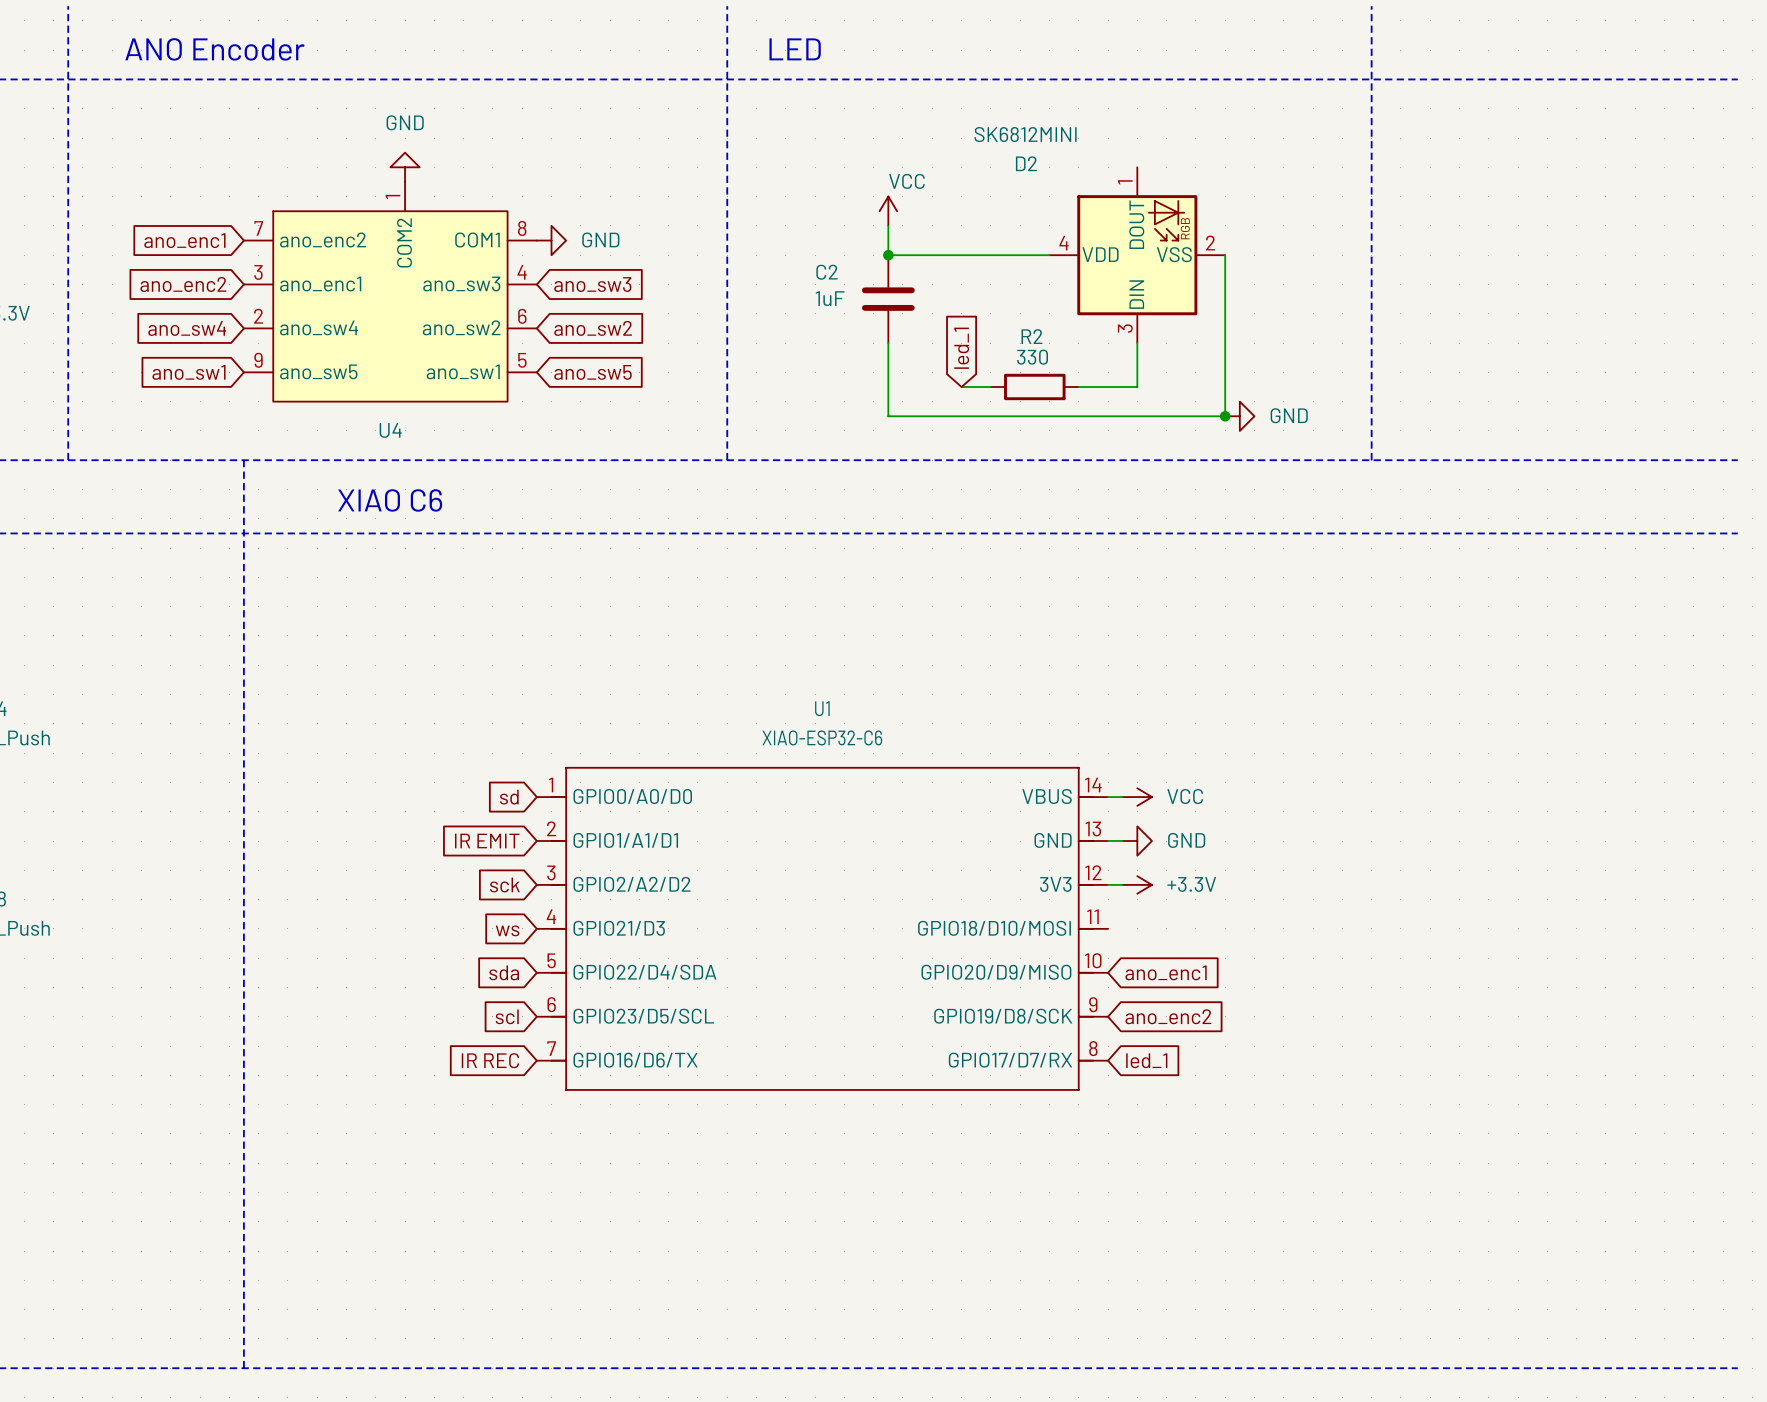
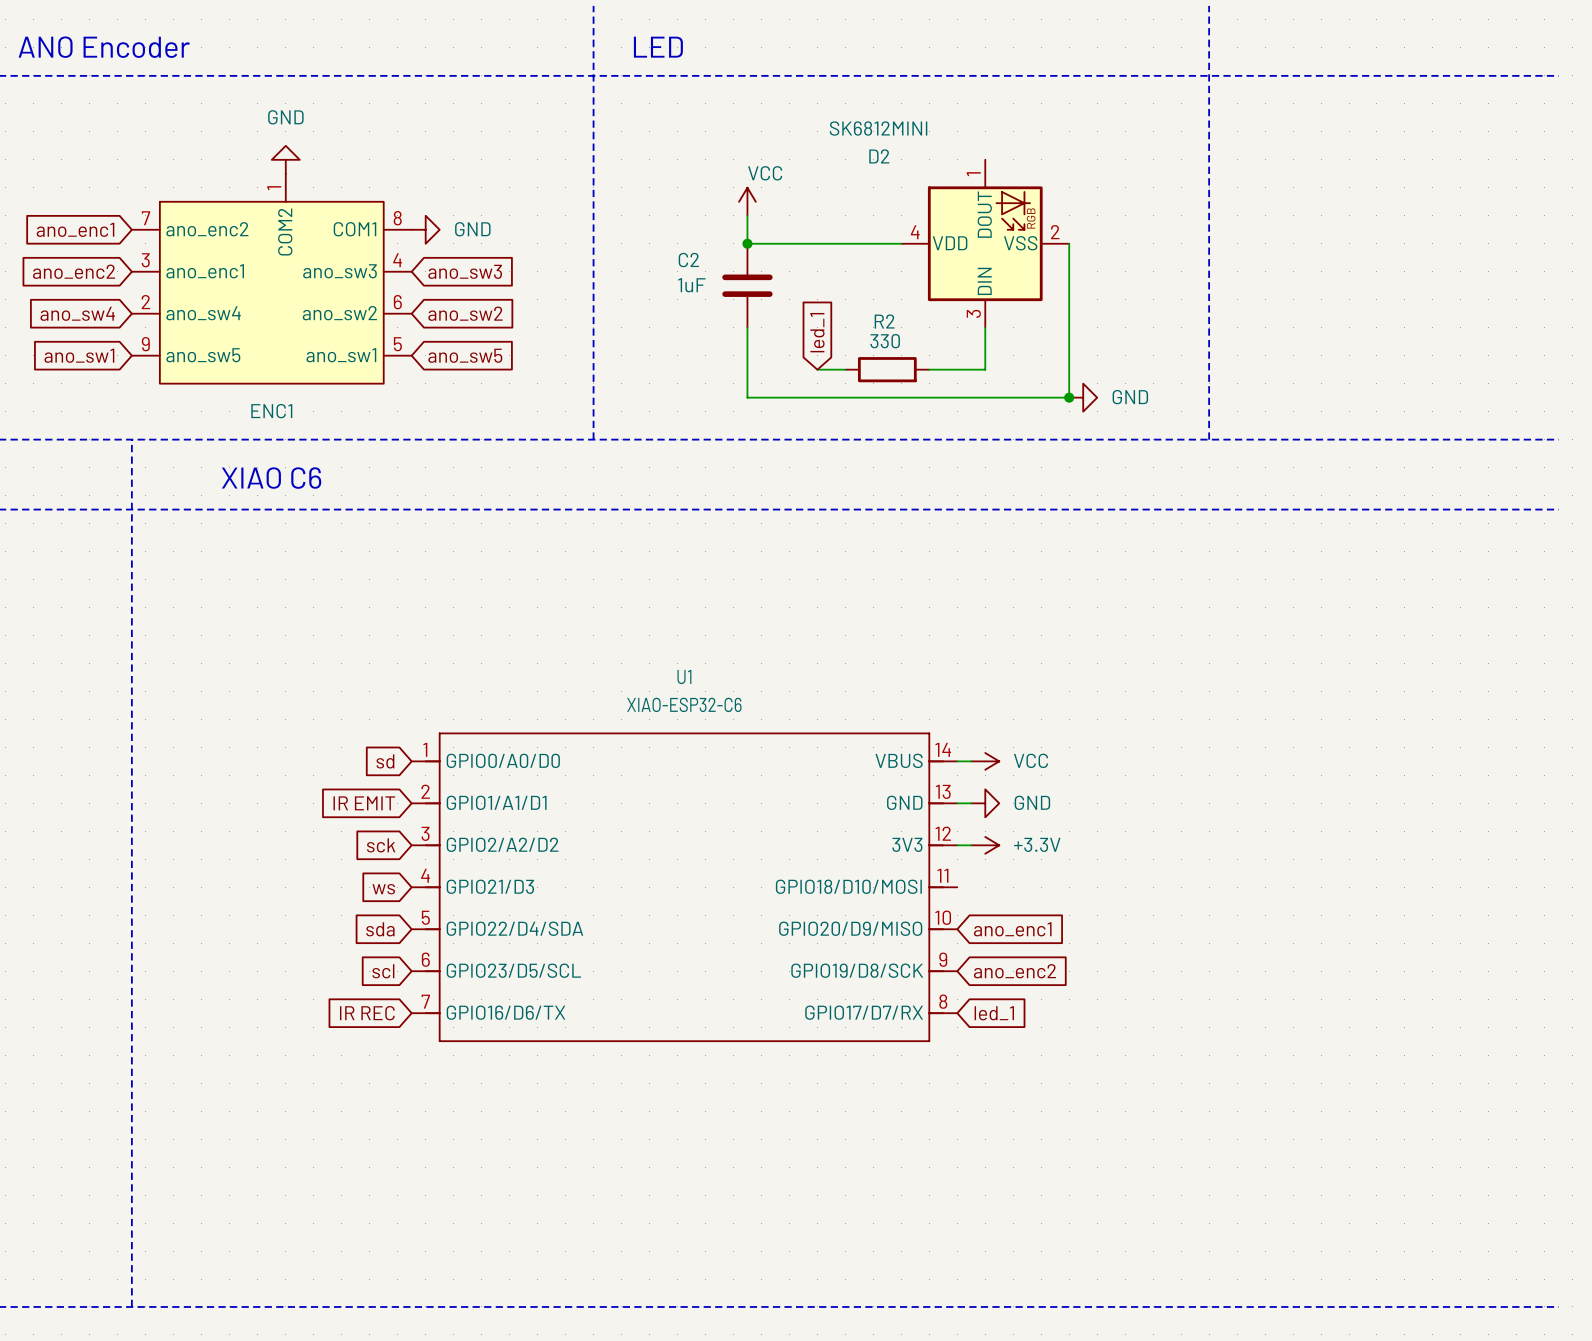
U4 name: U4 (390, 430) -> ENC1 (271, 411)

